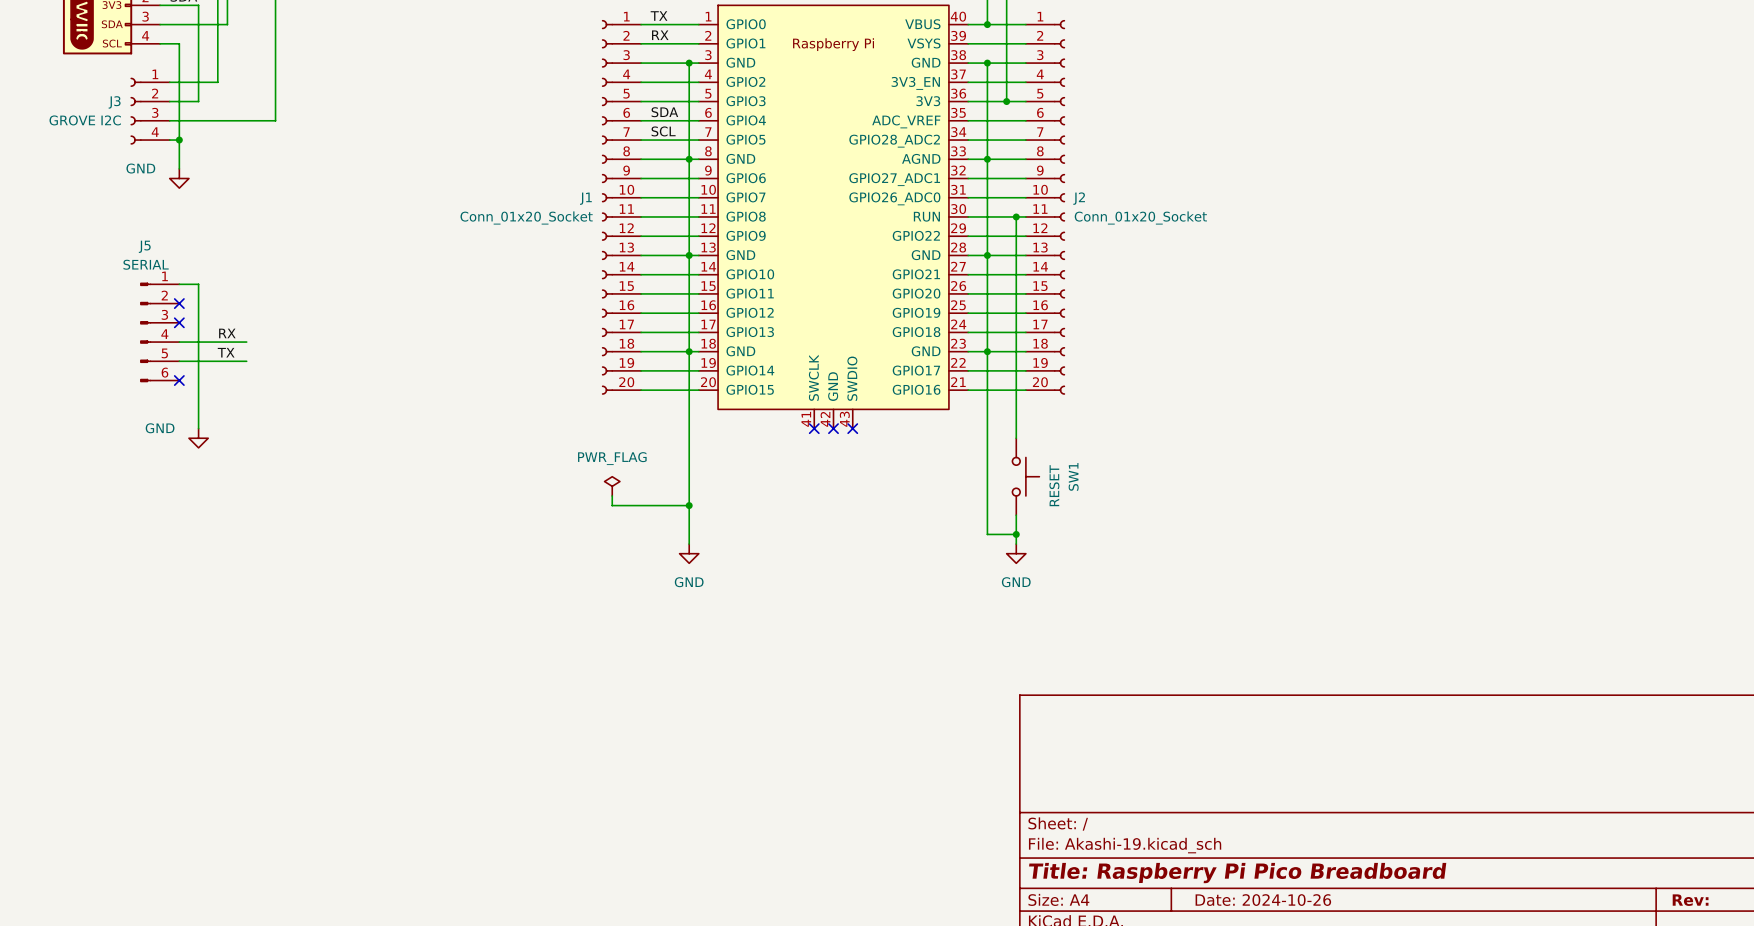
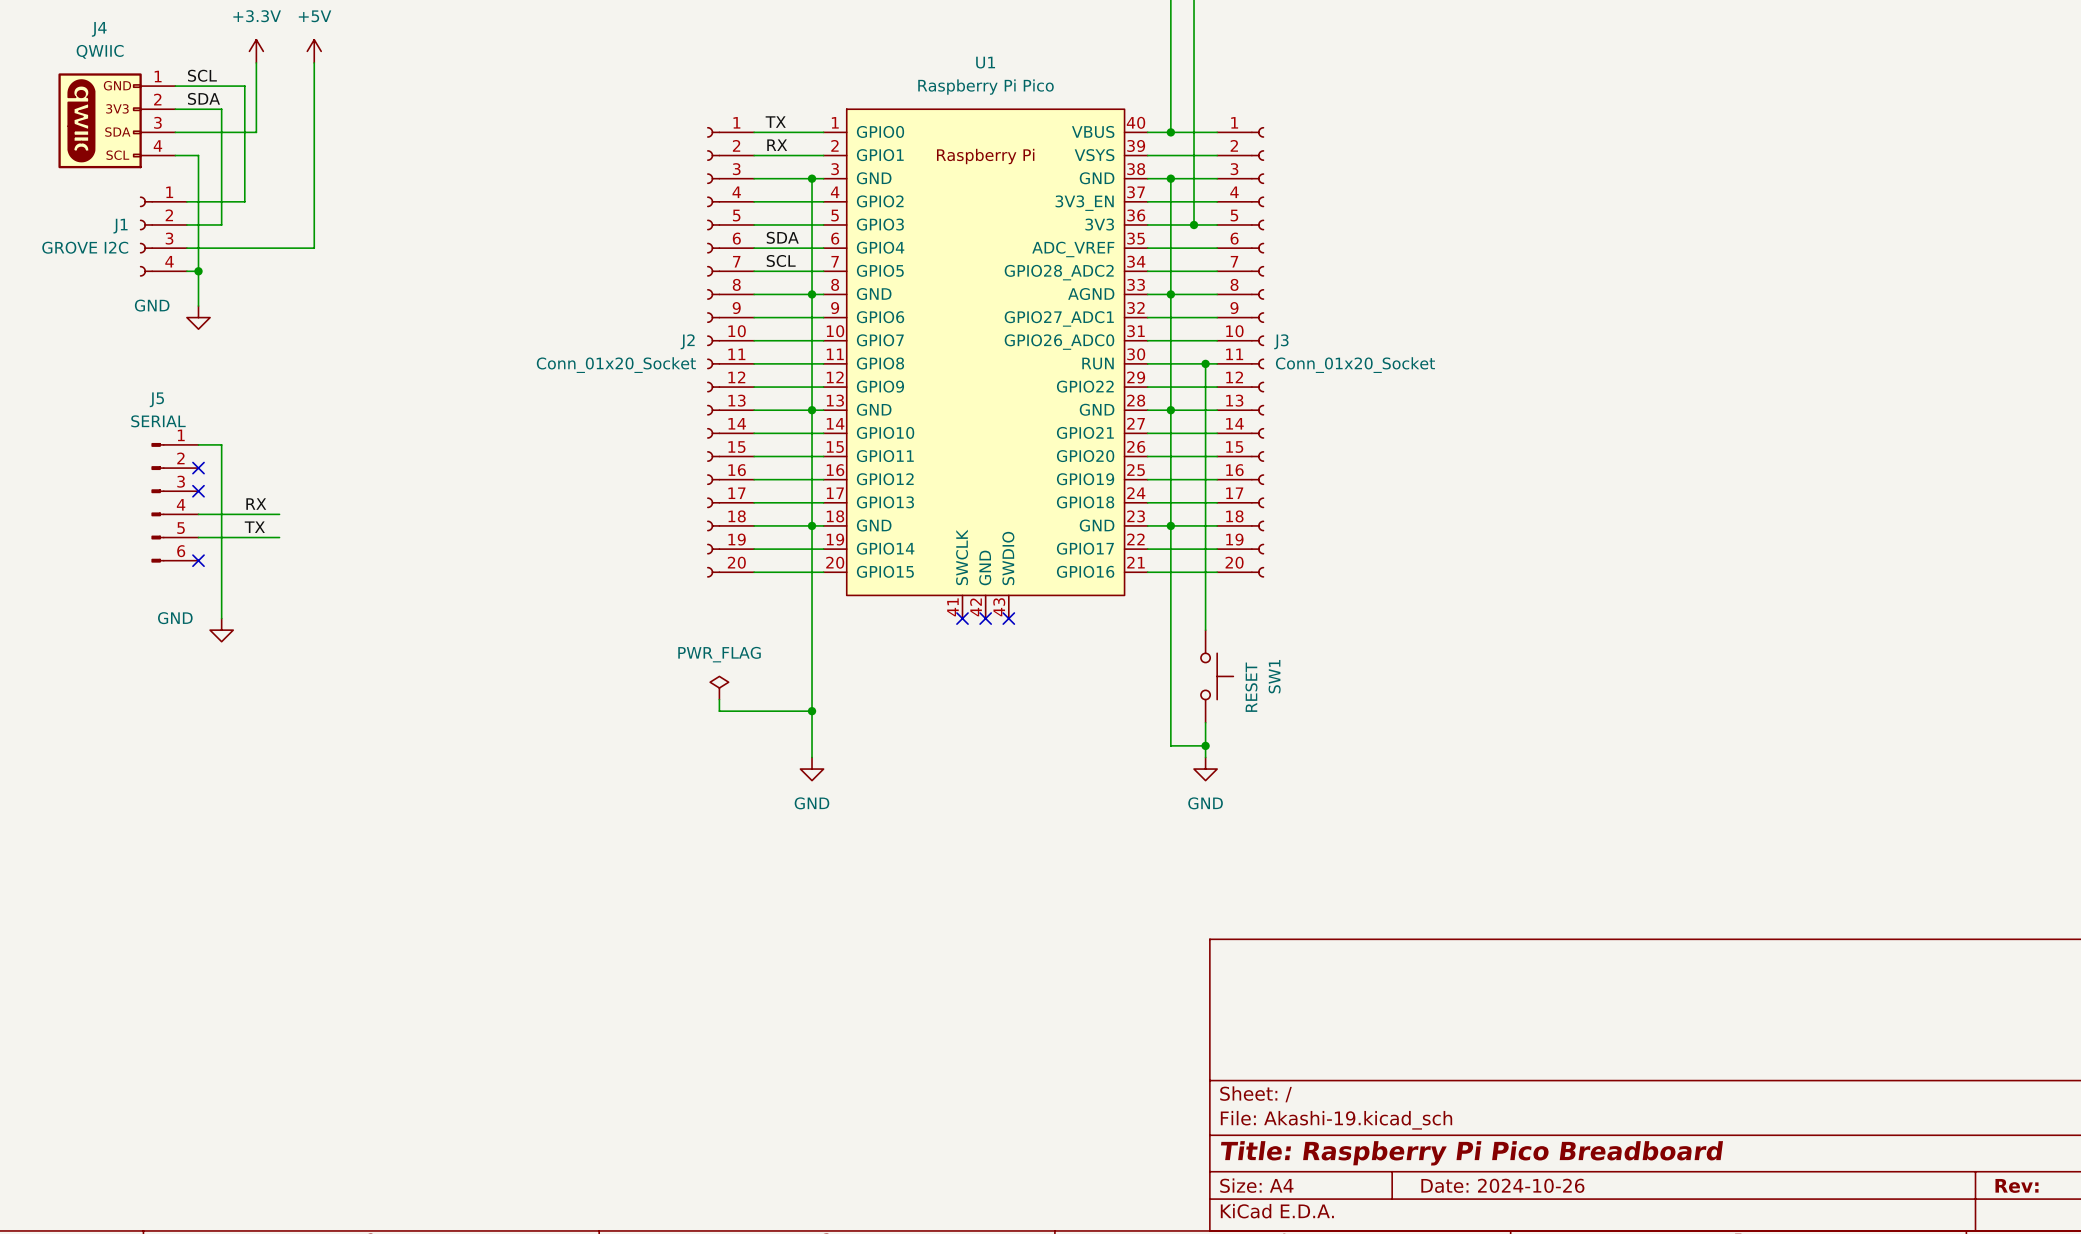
J3 name: J3 (114, 102) -> J1 (120, 226)
J1 name: J1 (585, 198) -> J2 (687, 341)
J2 name: J2 (1079, 198) -> J3 (1281, 341)

